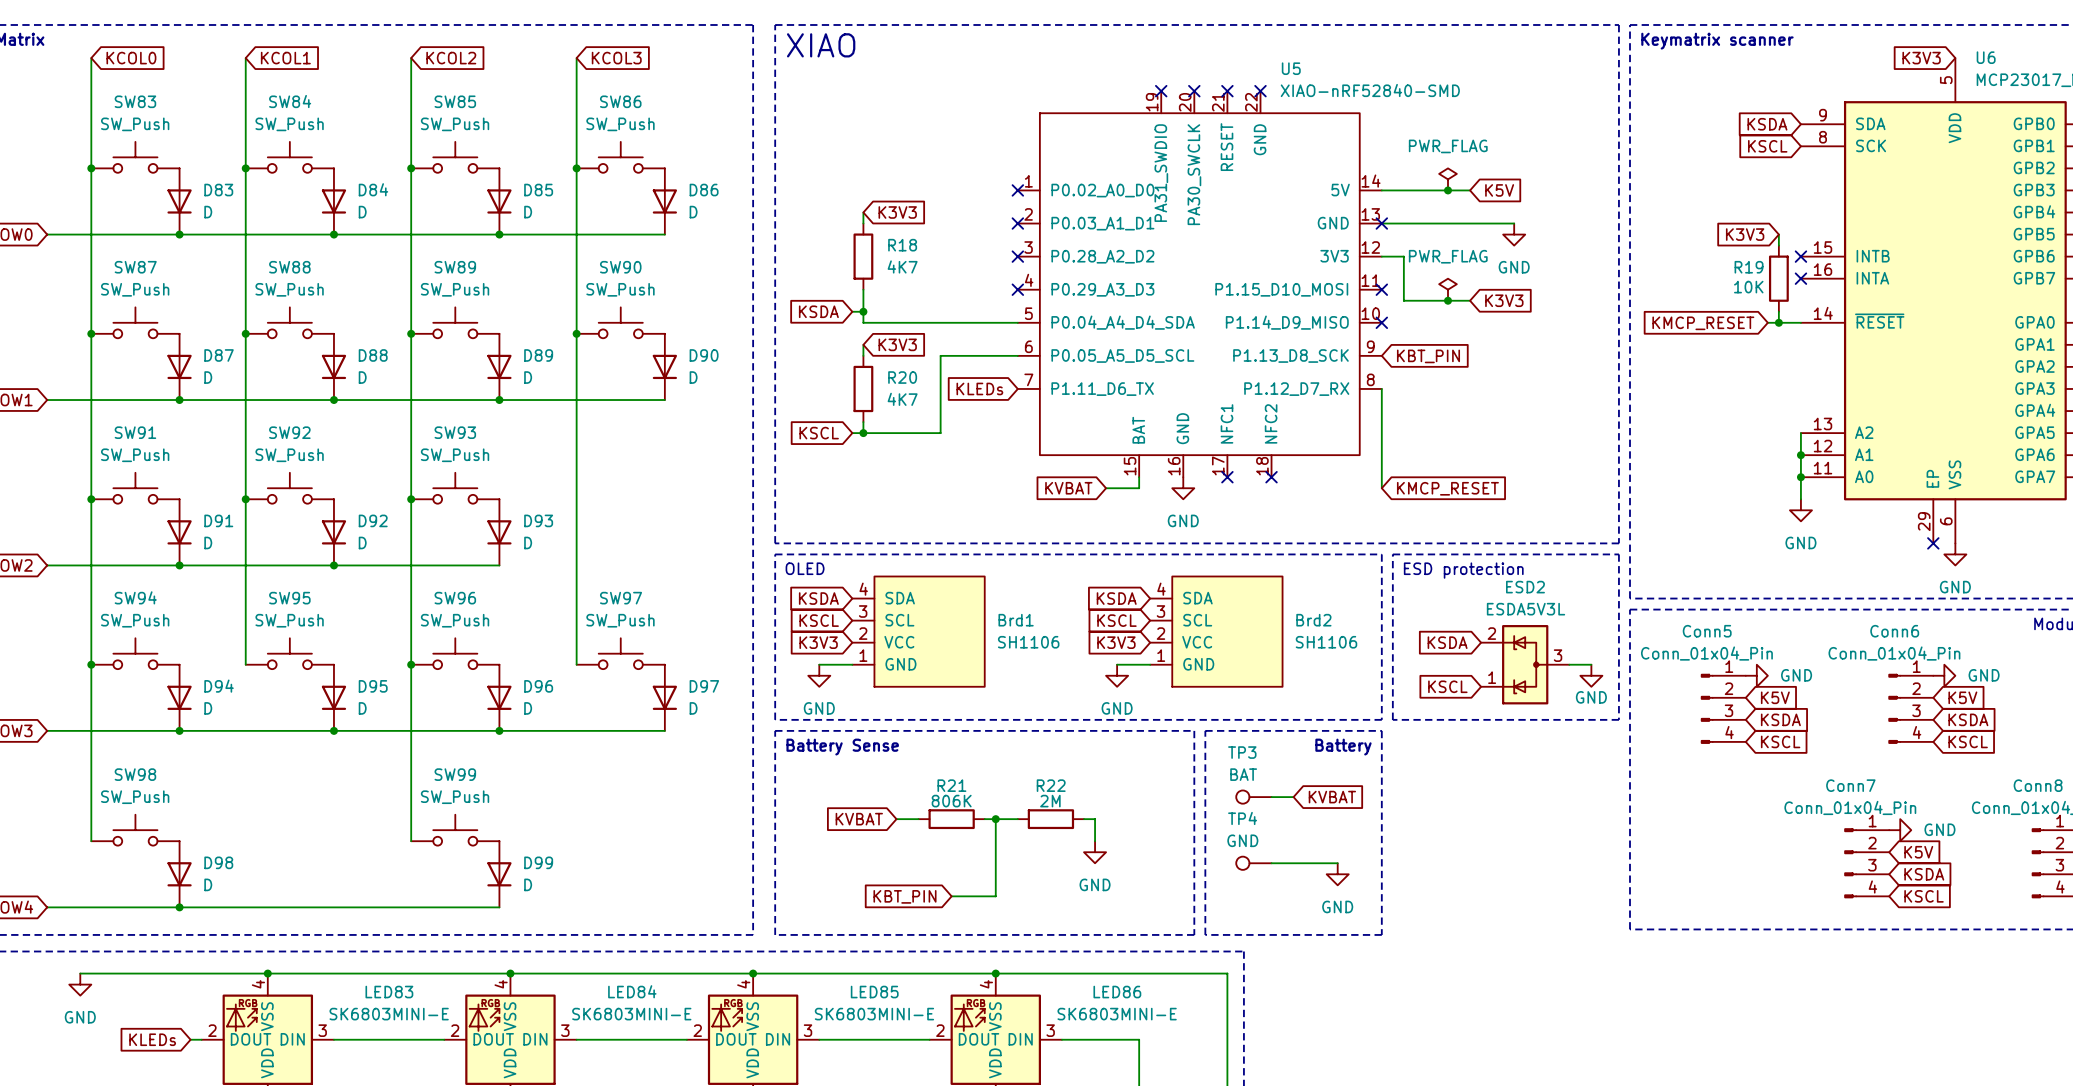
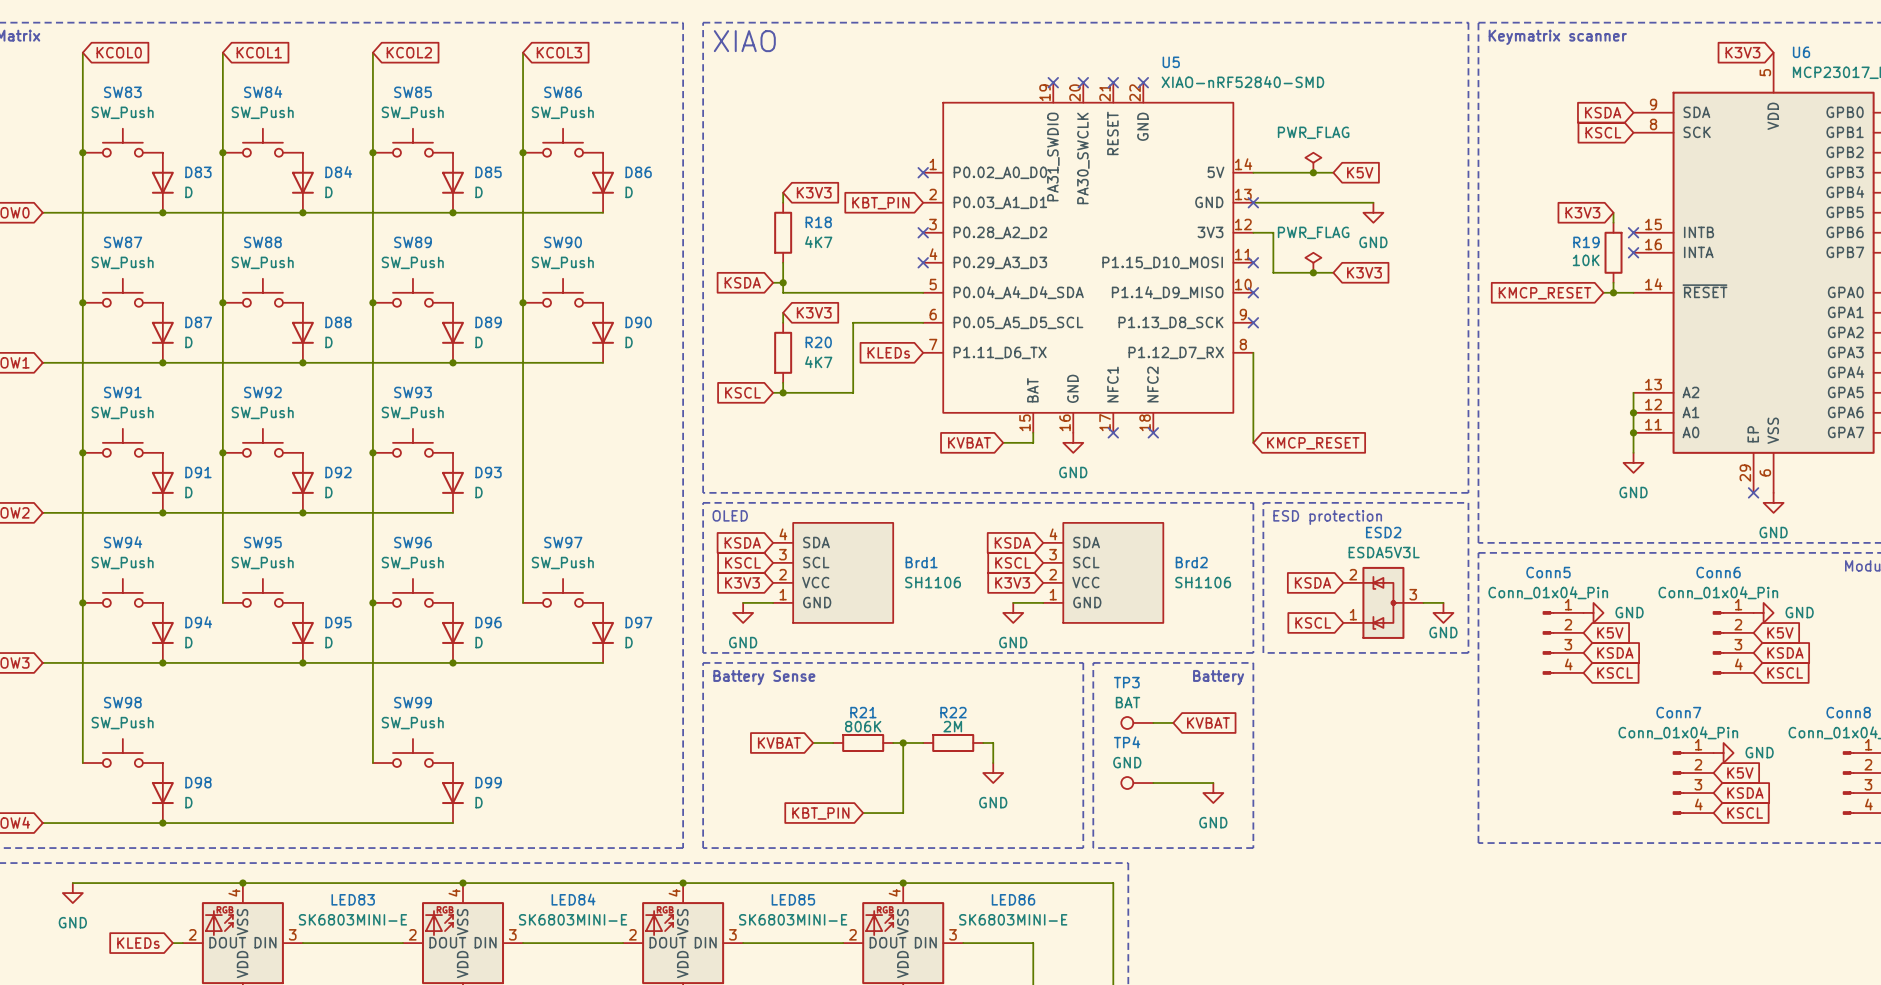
no-connect mark: (1017, 223) -> none
global label: none -> KBT_PIN (880, 203)
no-connect mark: none -> (1253, 322)
global label: KBT_PIN (1428, 356) -> none

